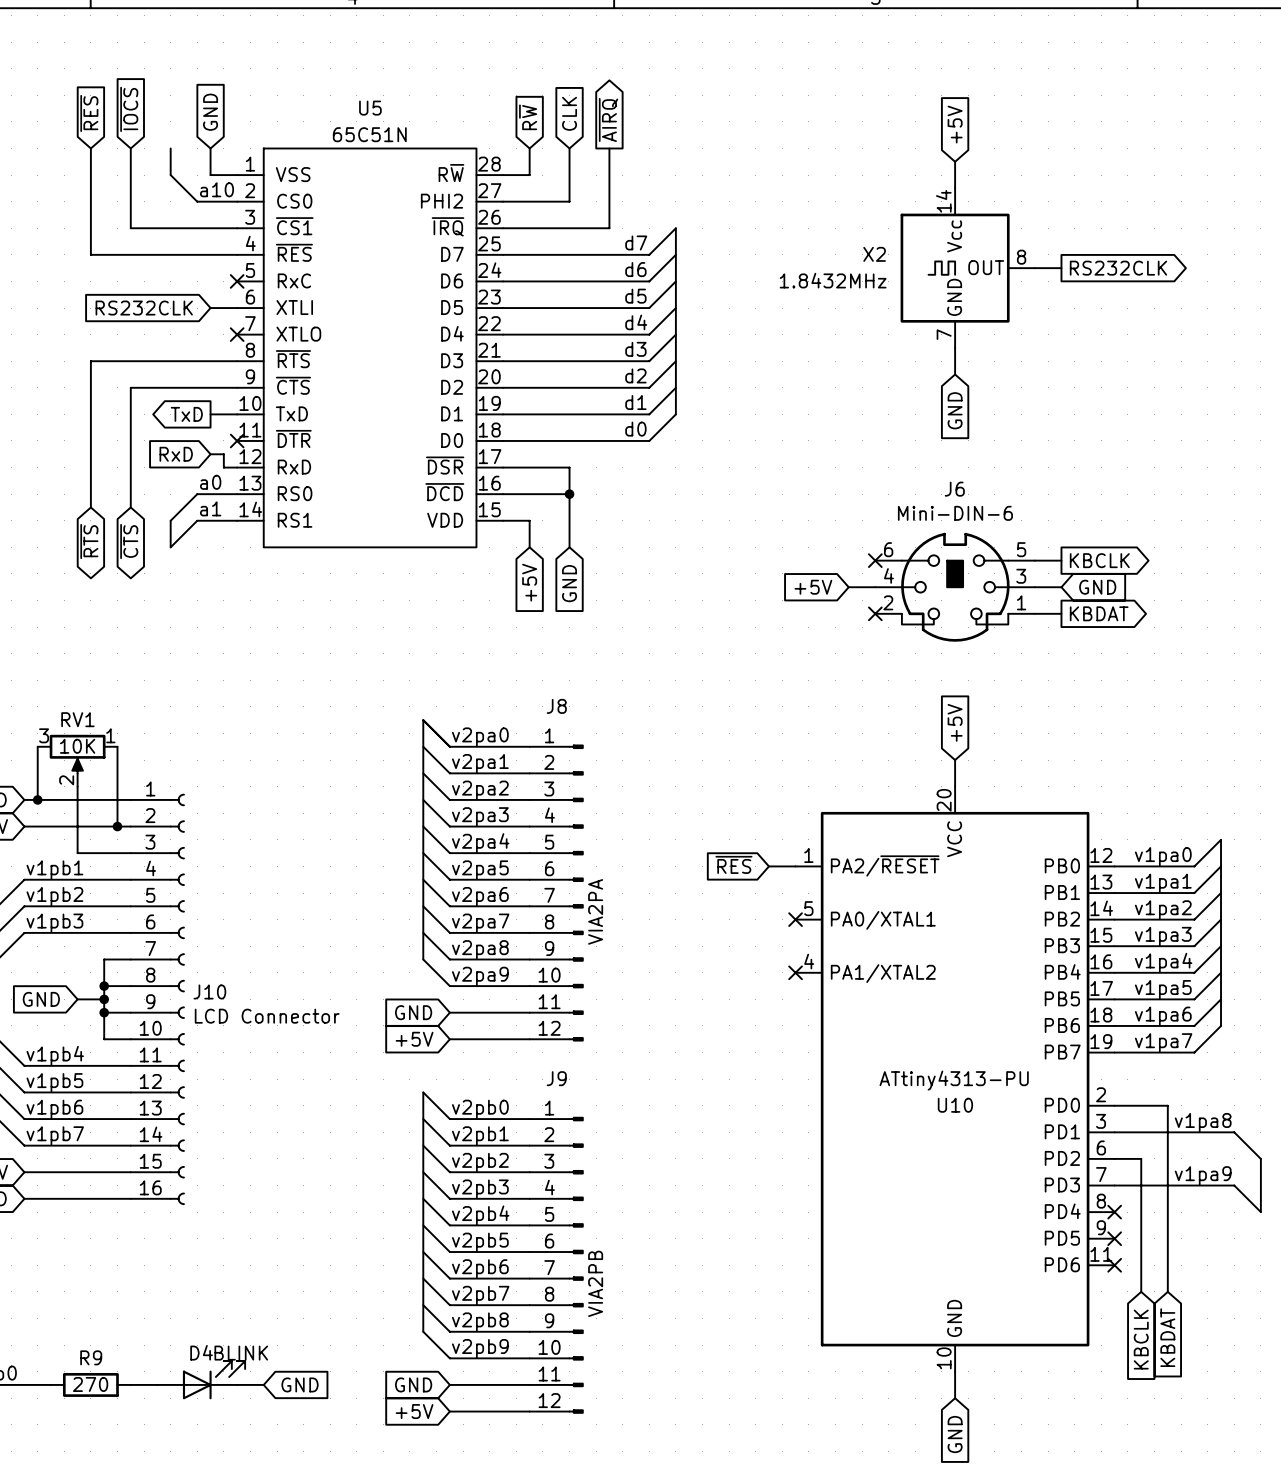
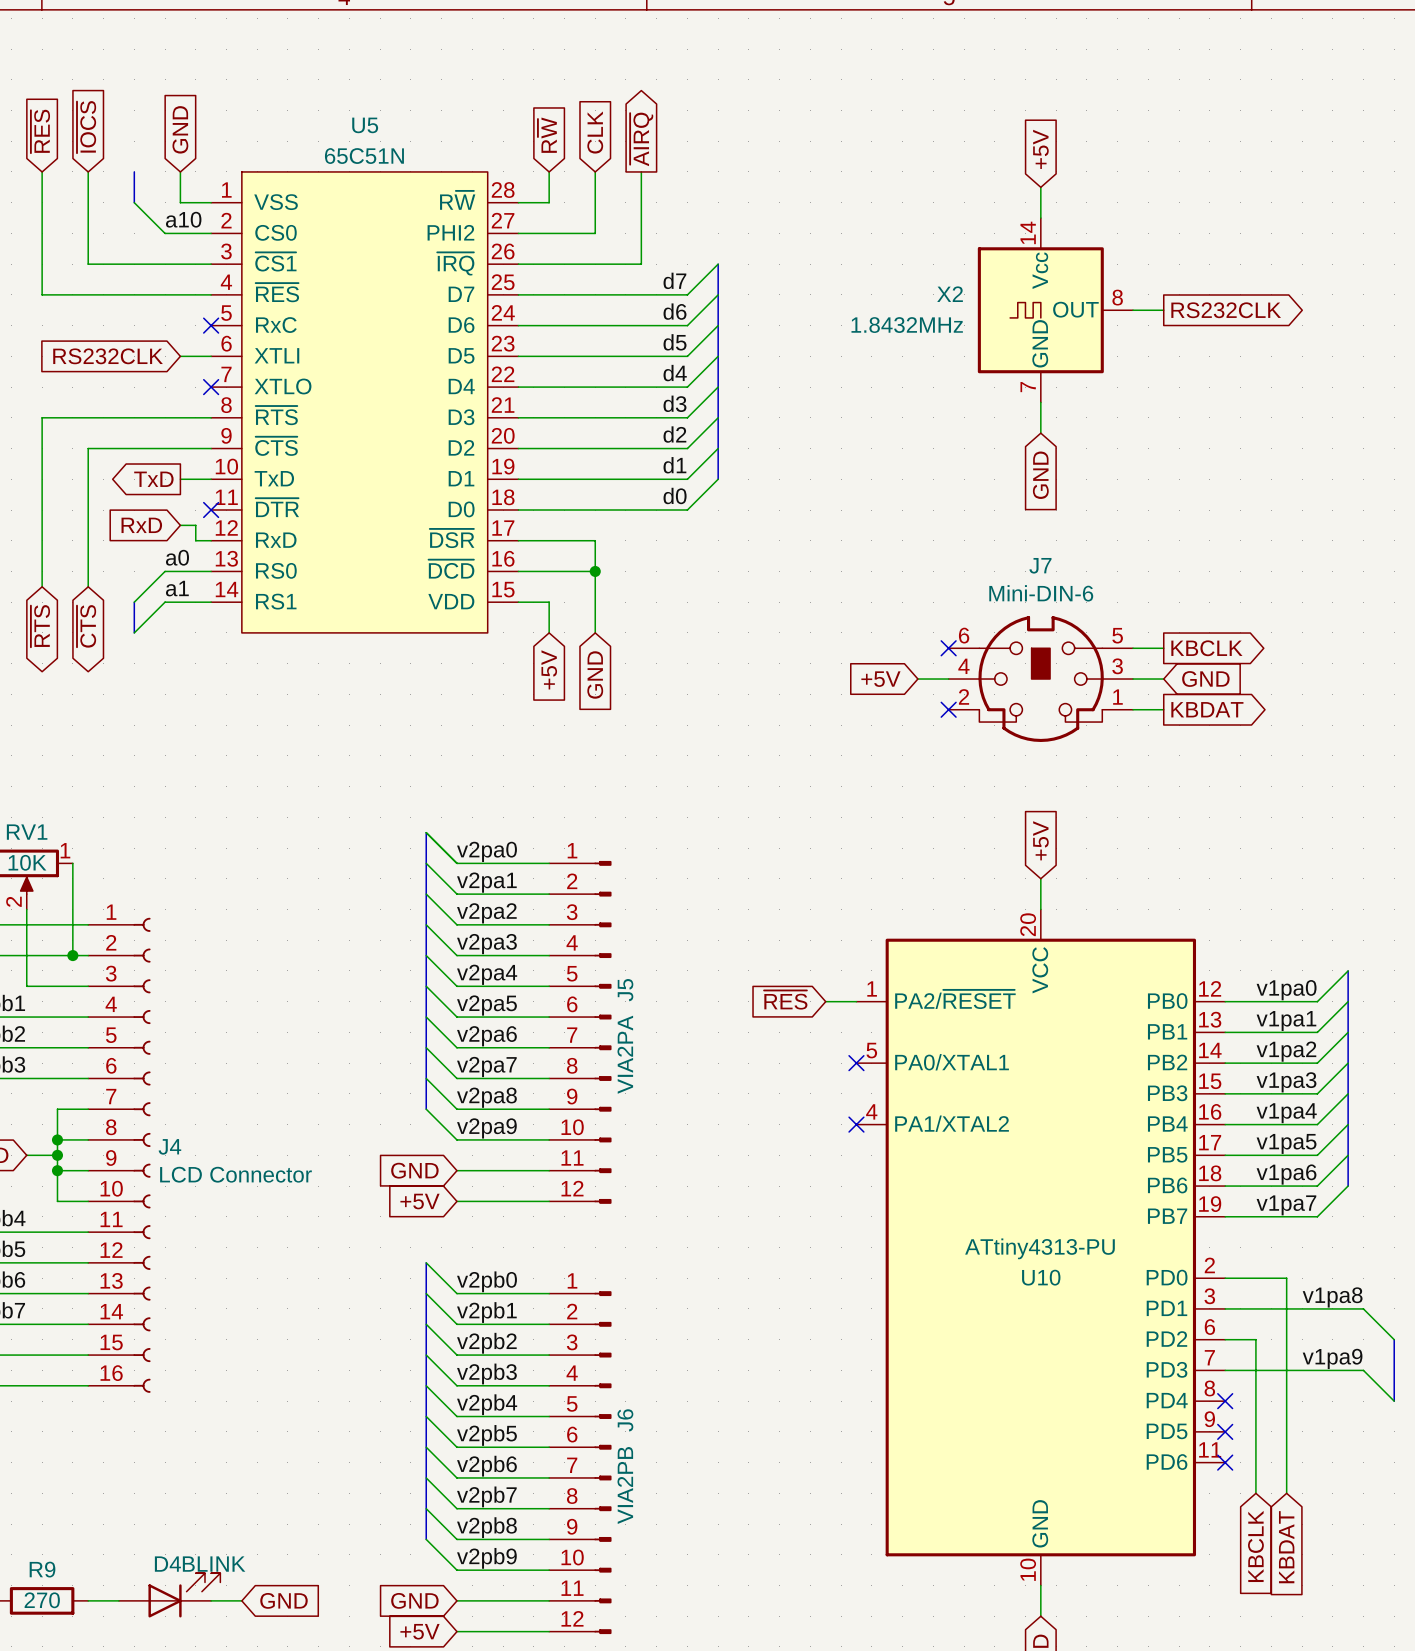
J6 name: J6 (954, 489) -> J7 (1040, 565)
J8 name: J8 (556, 706) -> J5 (625, 990)
J10 name: J10 (209, 991) -> J4 (169, 1146)
J9 name: J9 (556, 1078) -> J6 (625, 1420)

